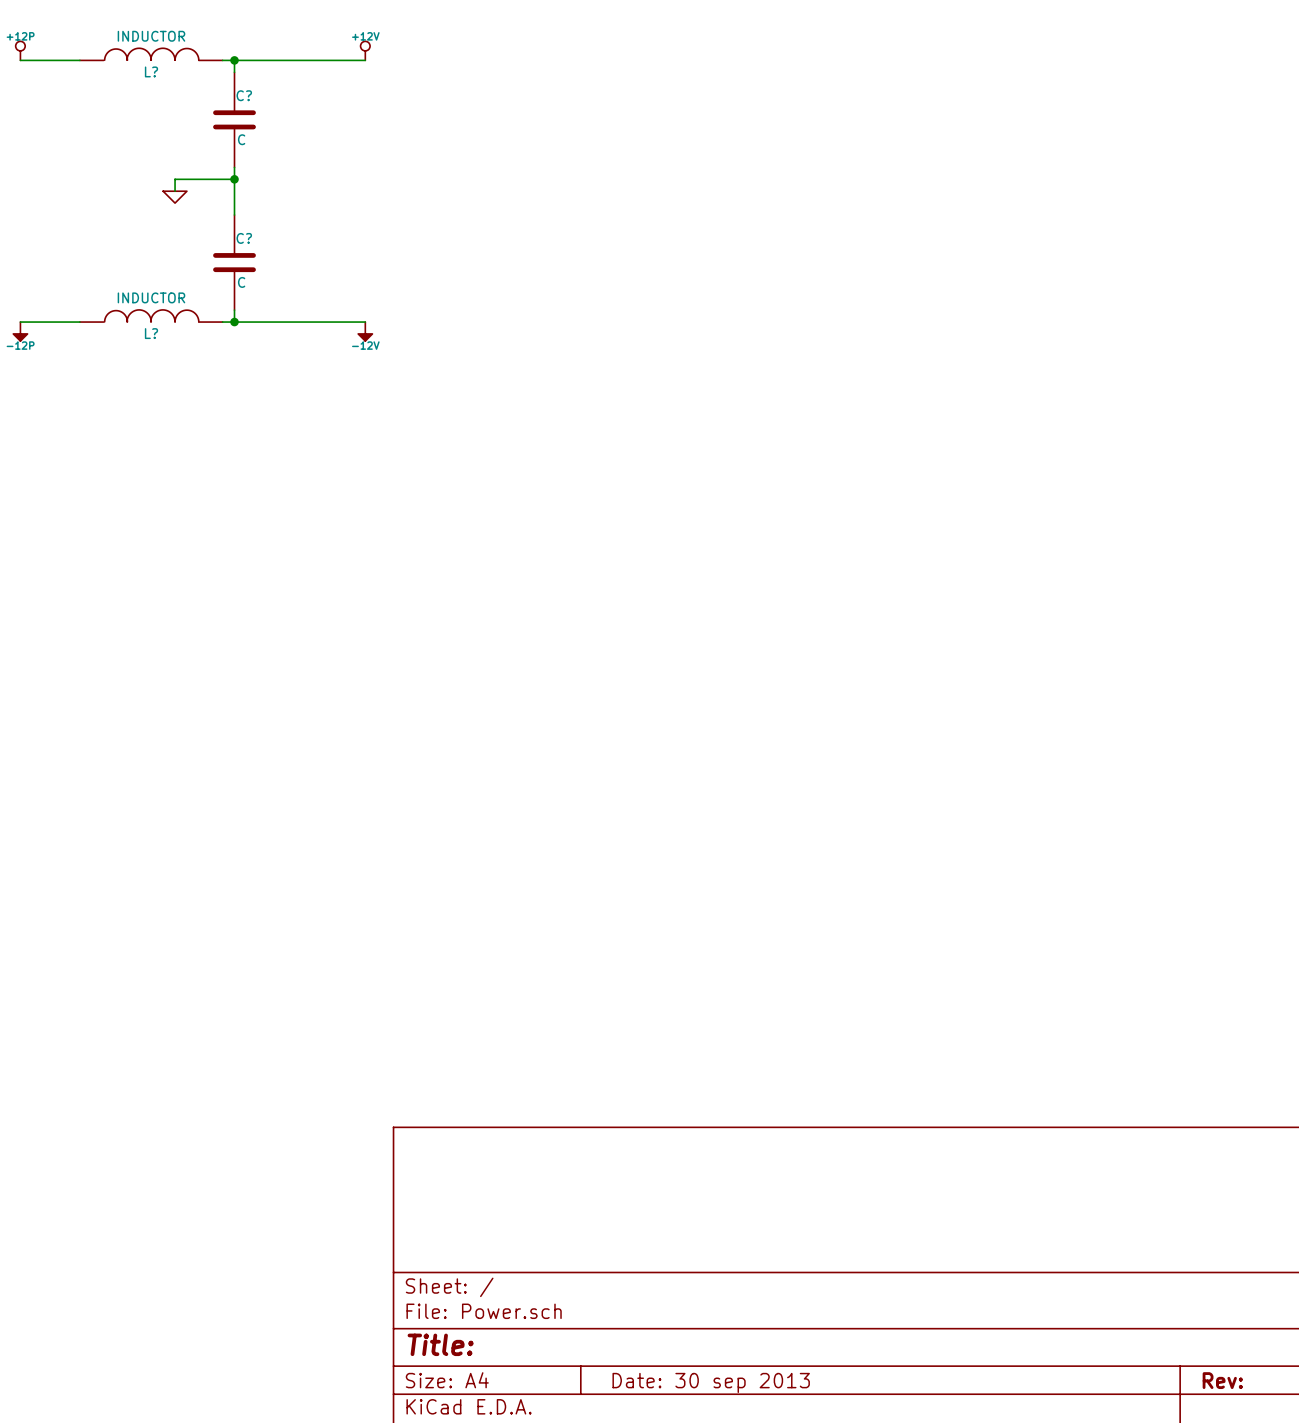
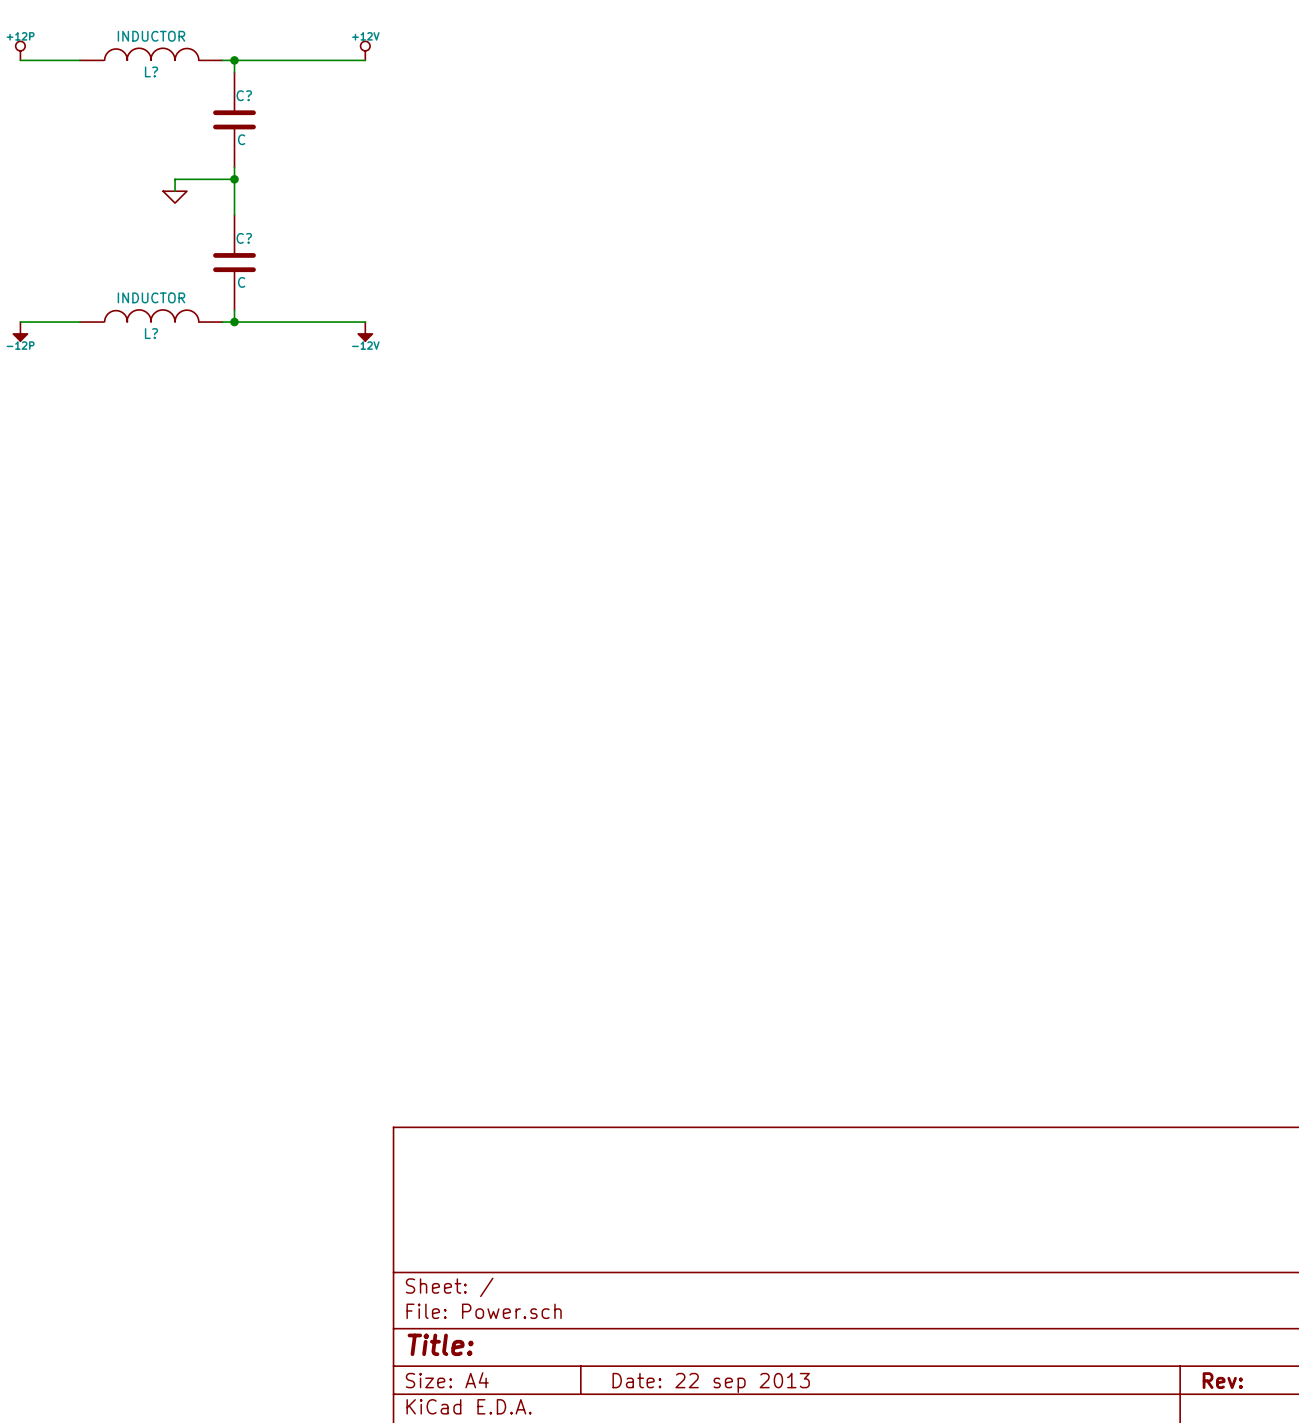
title block: Date: 30 sep 2013 (711, 1382) -> Date: 22 sep 2013 (711, 1382)

